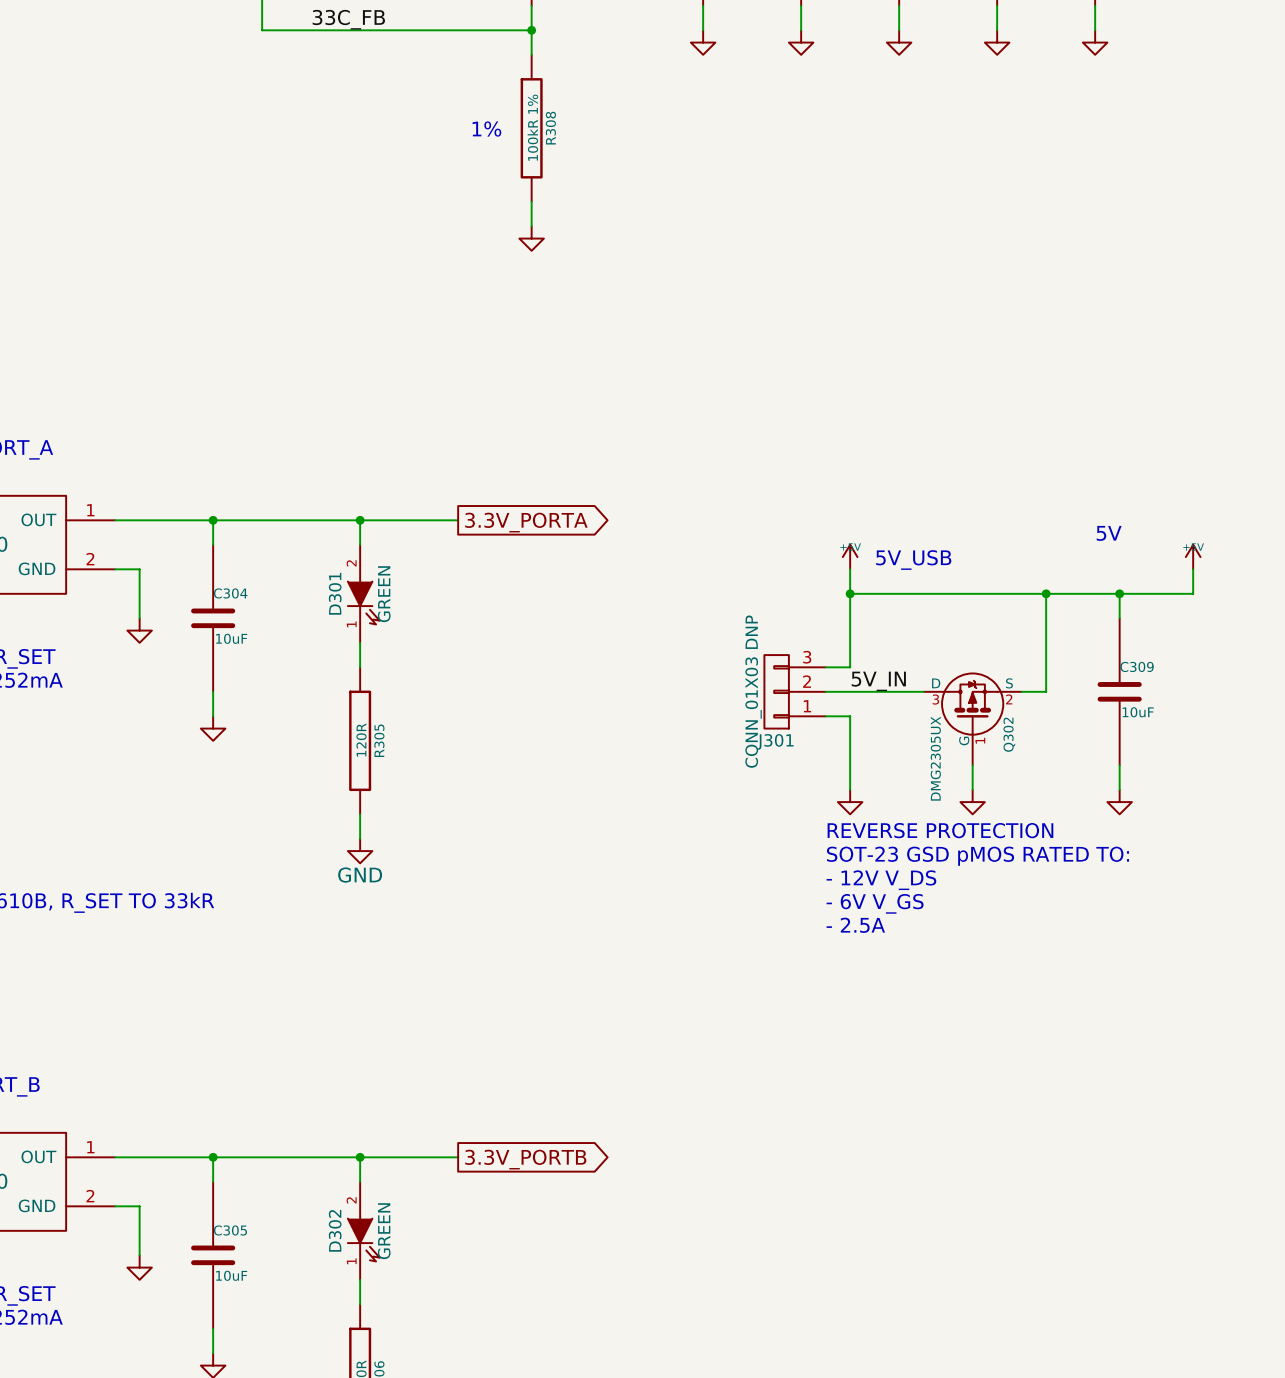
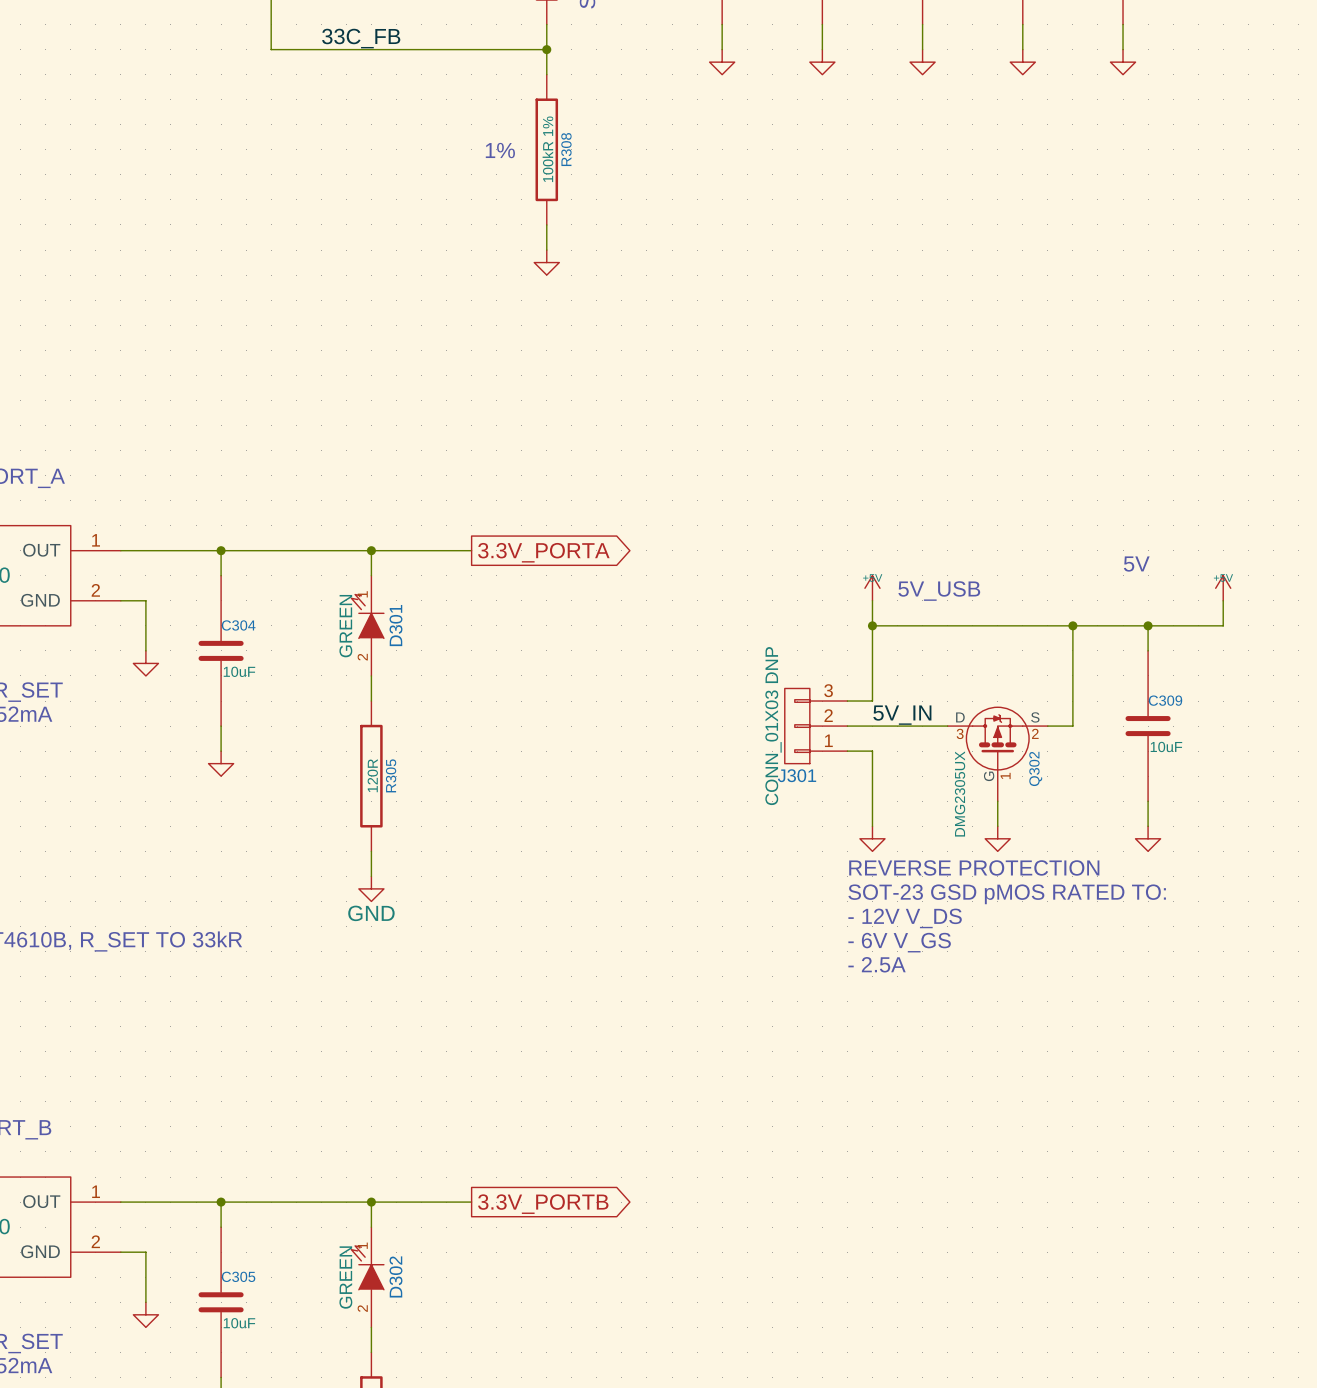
D301 rotation: 0° (363, 603) -> 180° (367, 616)
D302 rotation: 0° (363, 1240) -> 180° (367, 1267)

